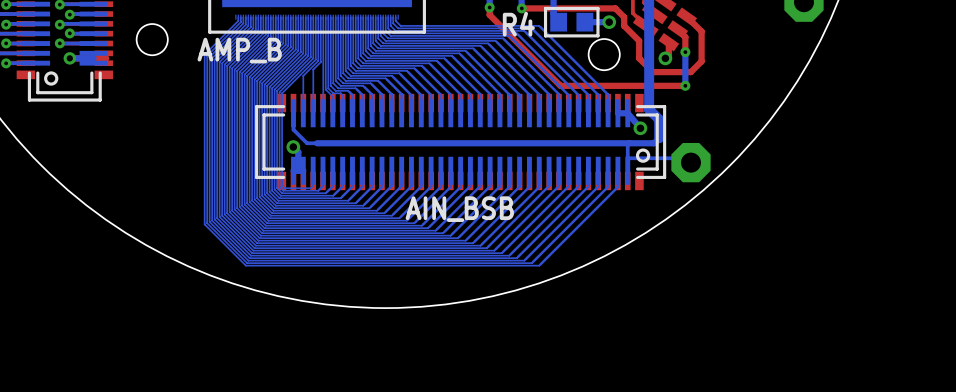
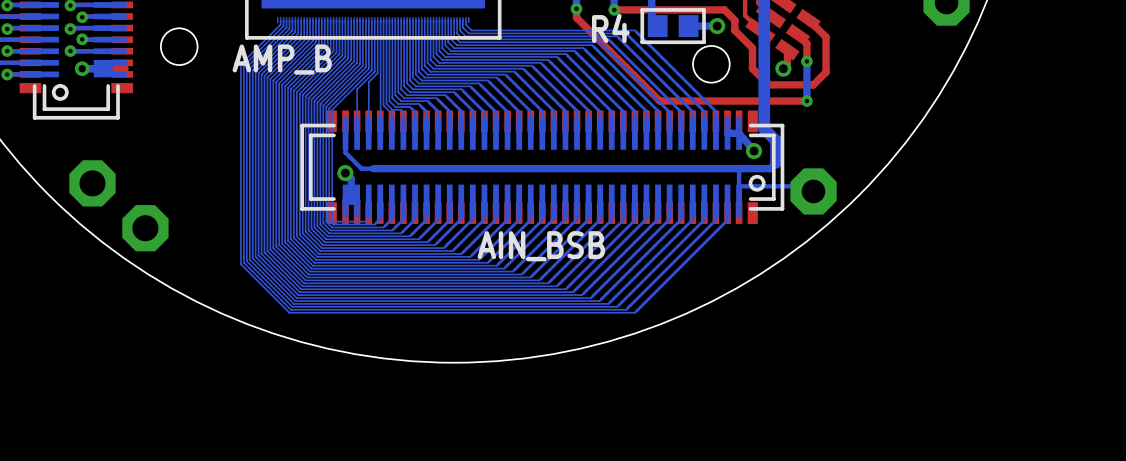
part: none -> (92, 183)
part: none -> (145, 228)

